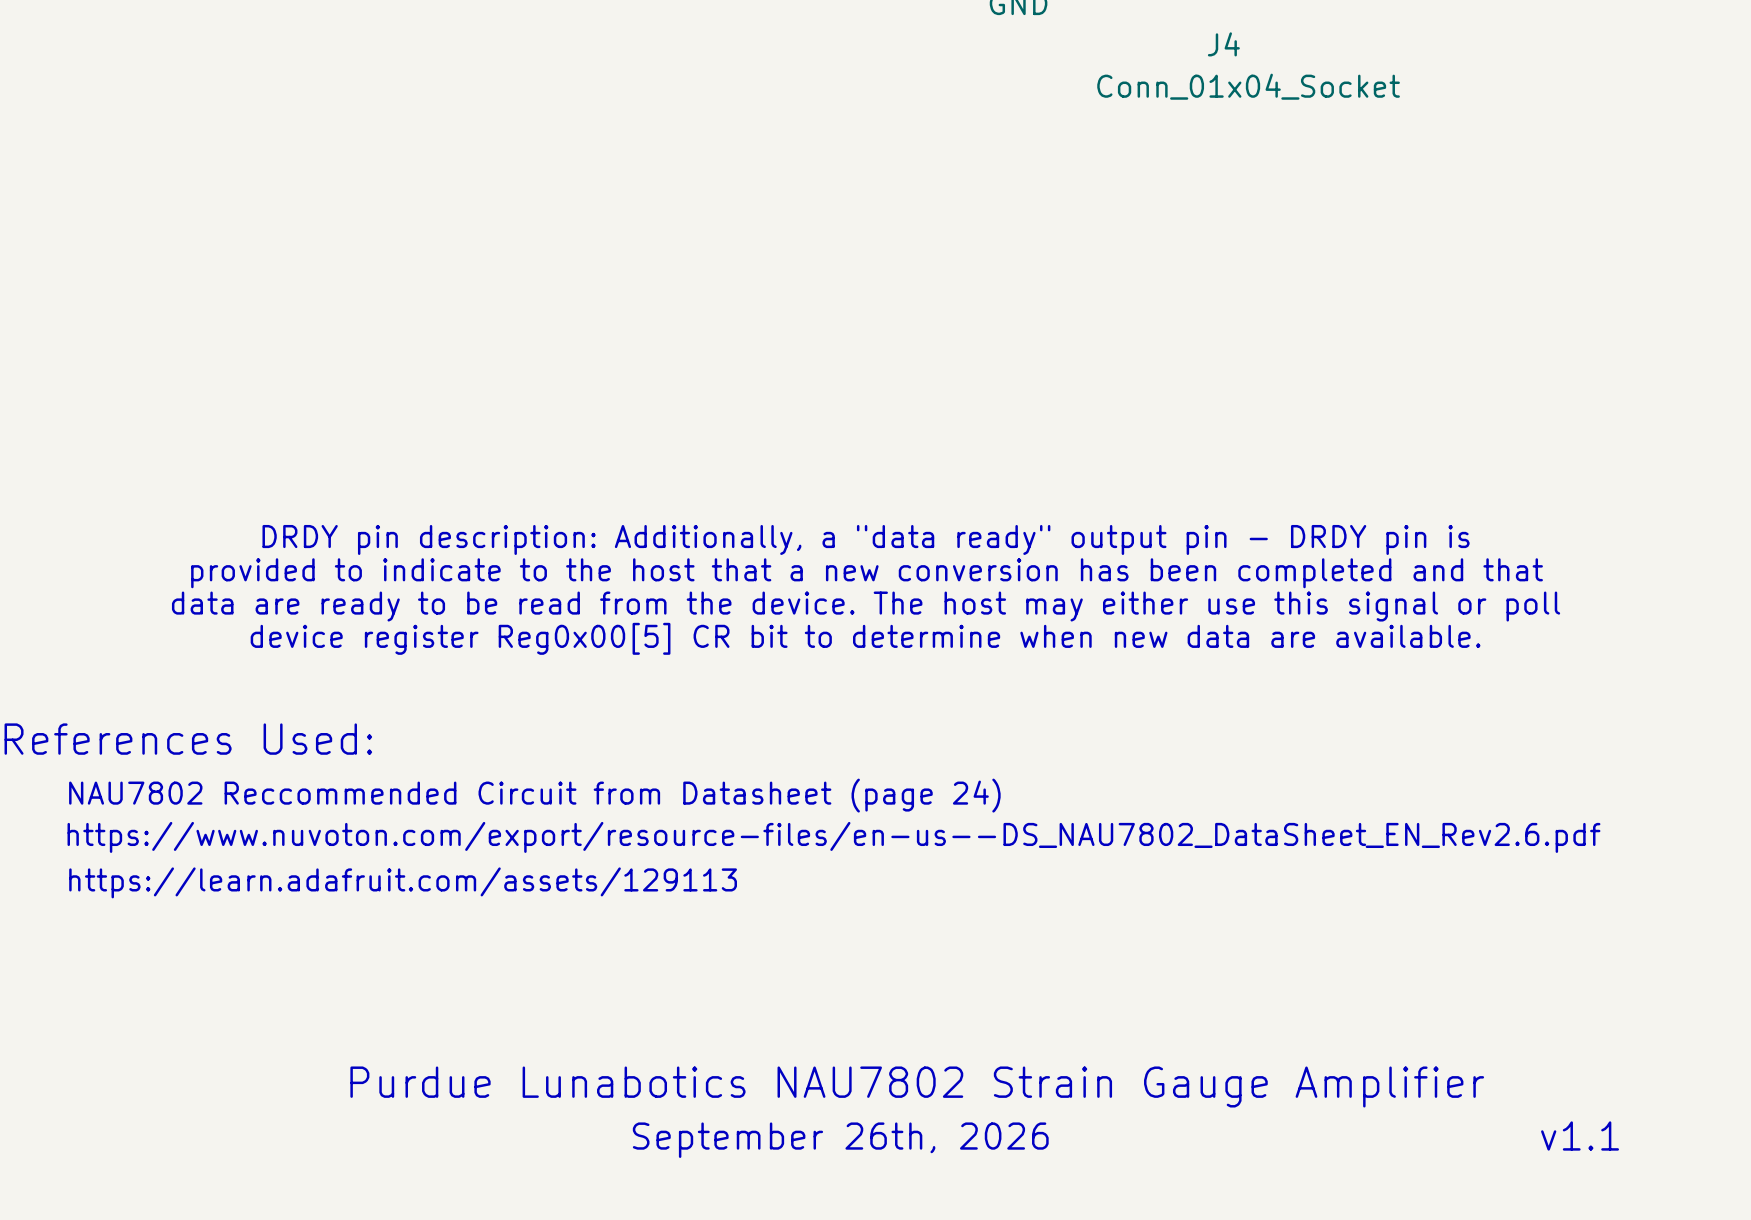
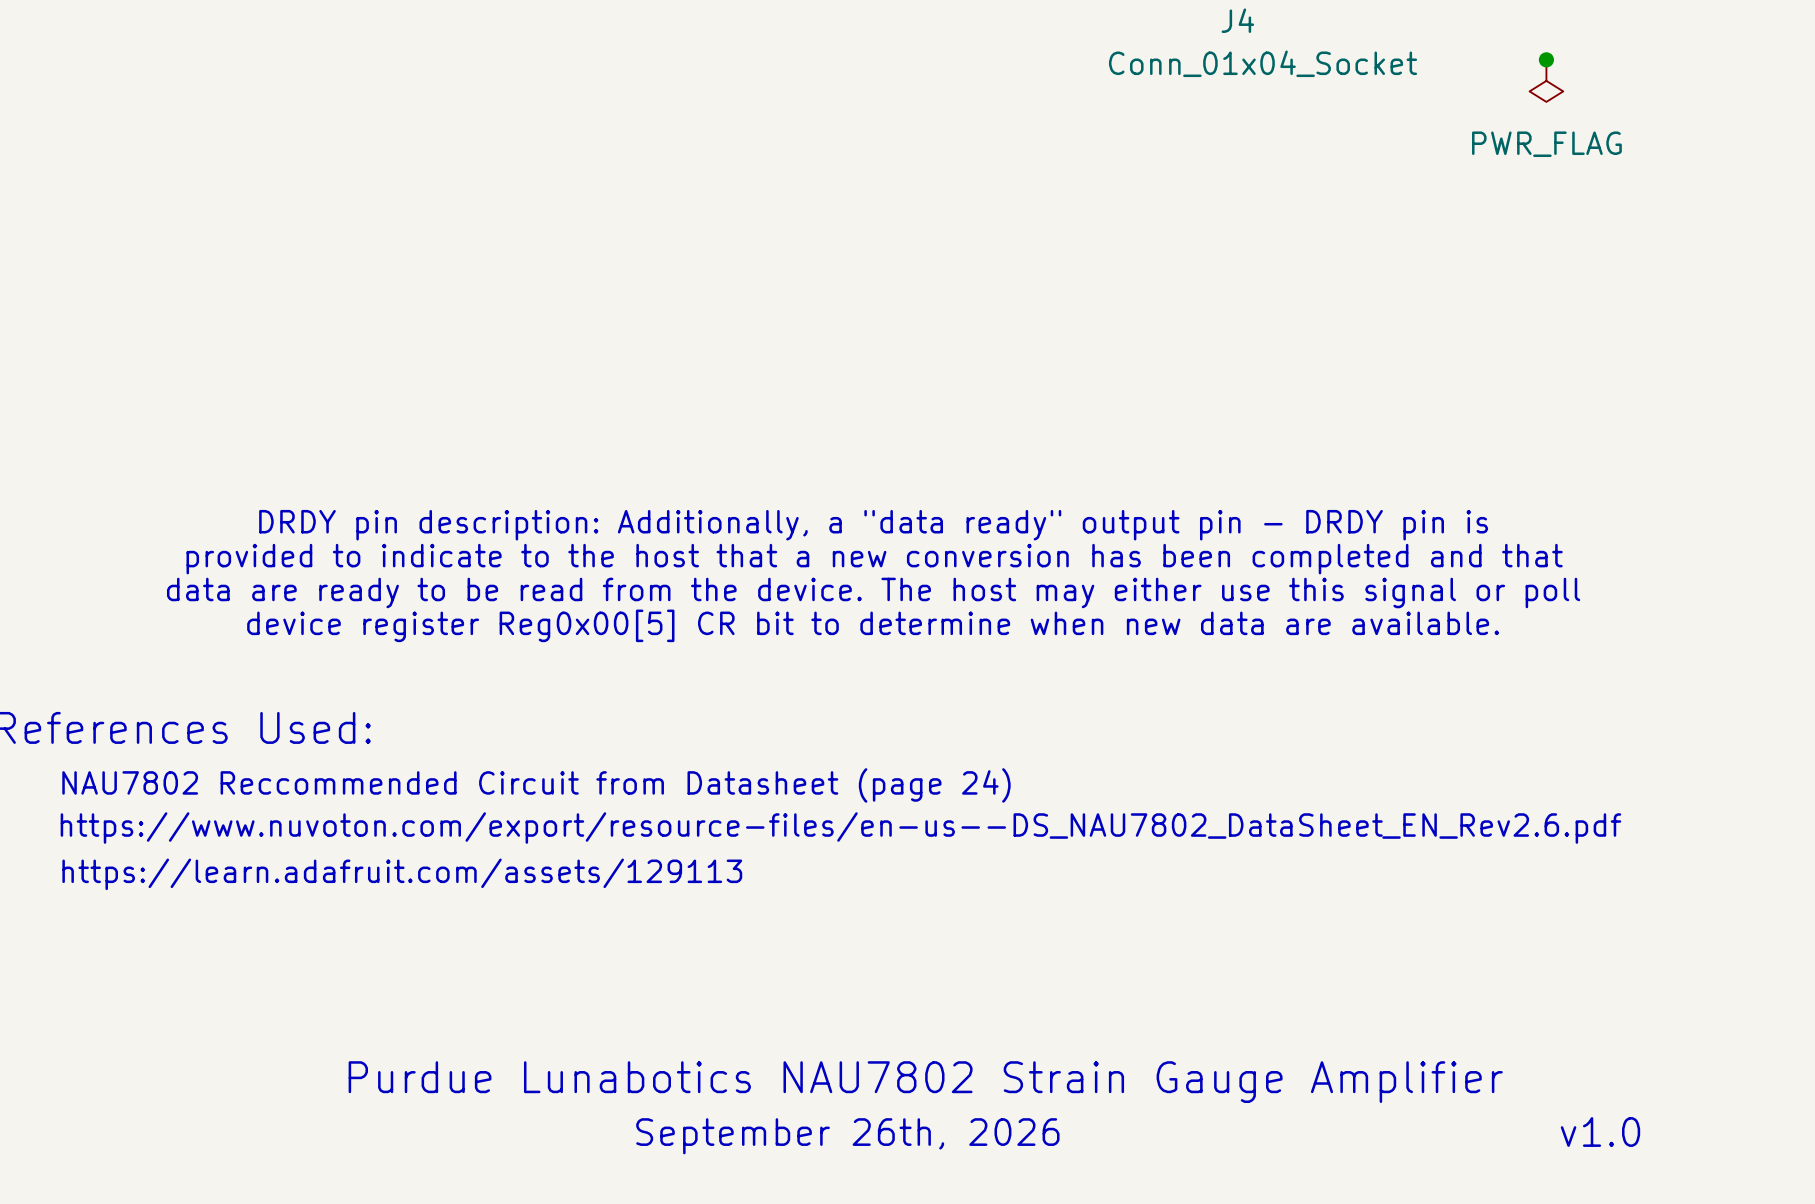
junction: none -> (1546, 59)
power symbol: none -> PWR_FLAG (1546, 80)
text: v1.1 (1580, 1135) -> v1.0 (1600, 1131)

